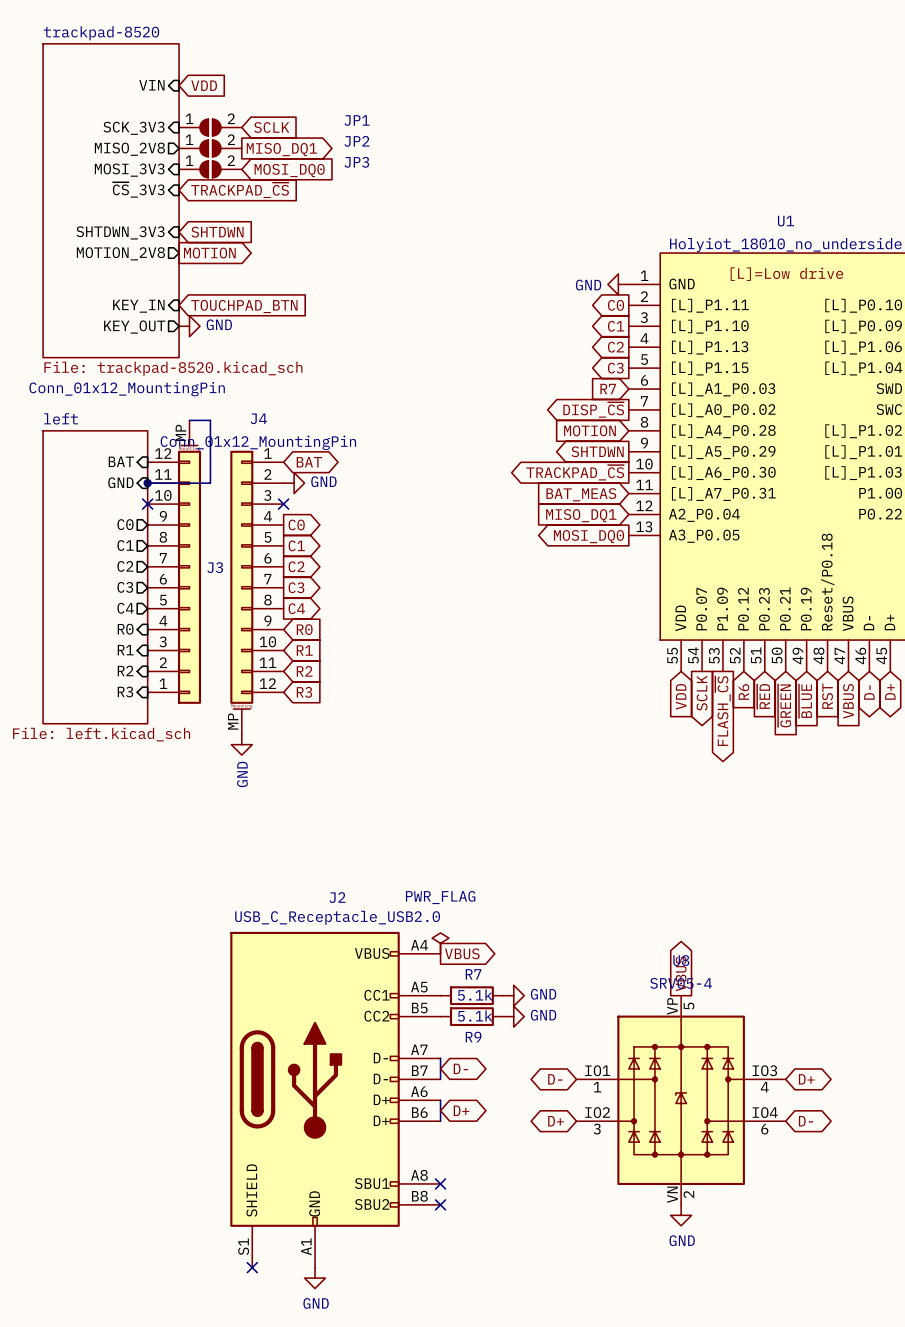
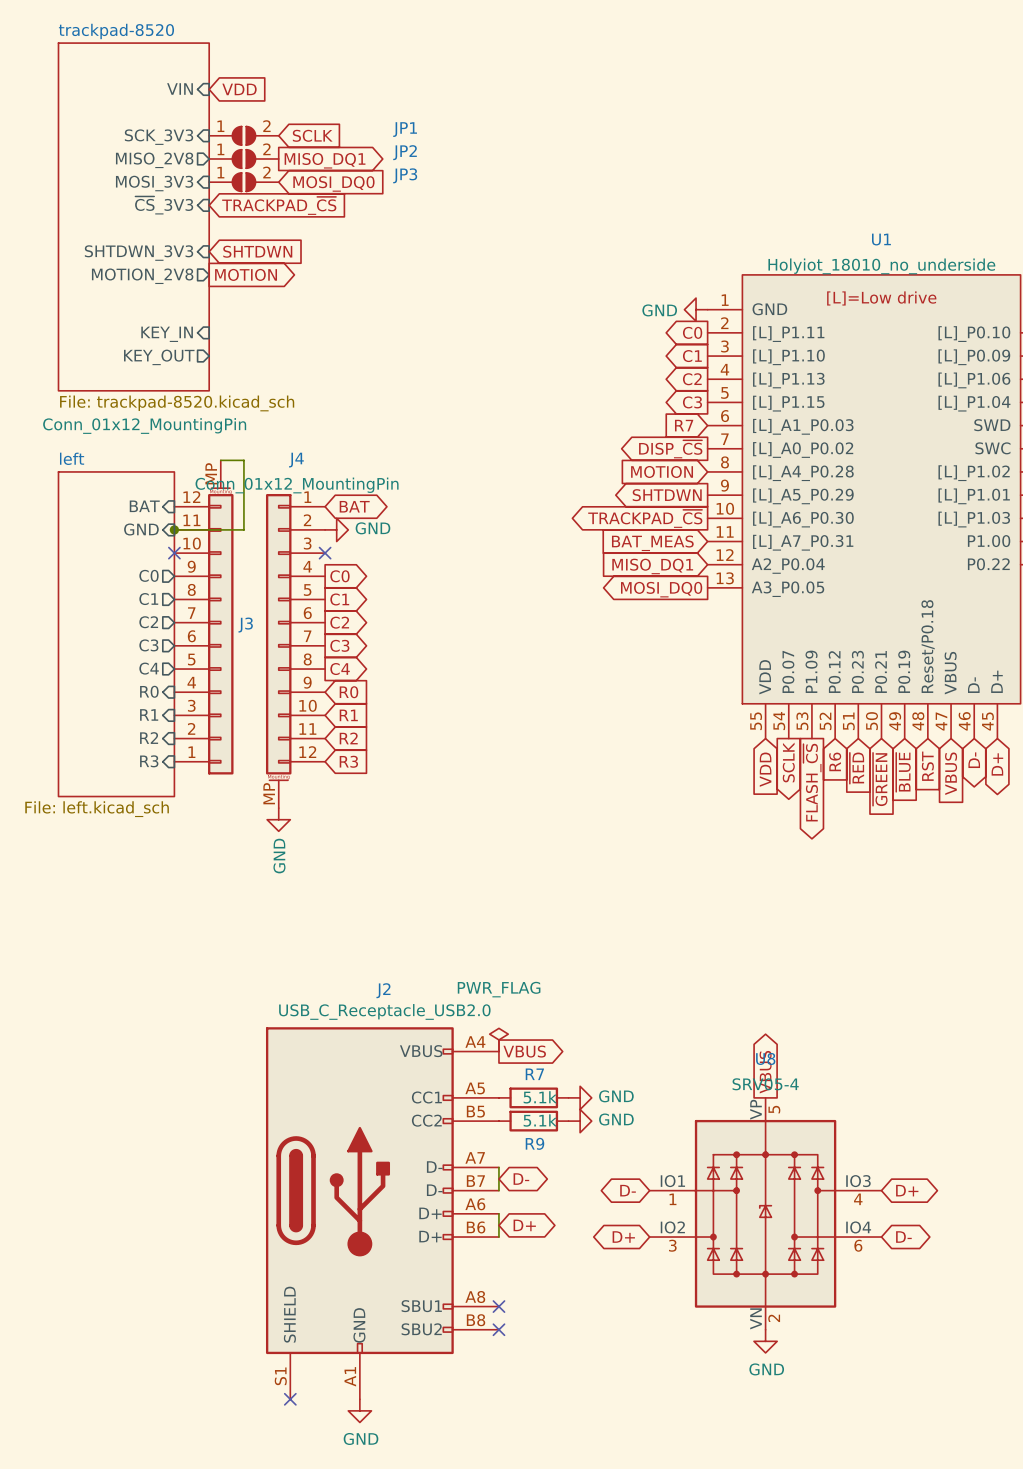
global label: TOUCHPAD_BTN (244, 306) -> none
power symbol: GND (189, 326) -> none

